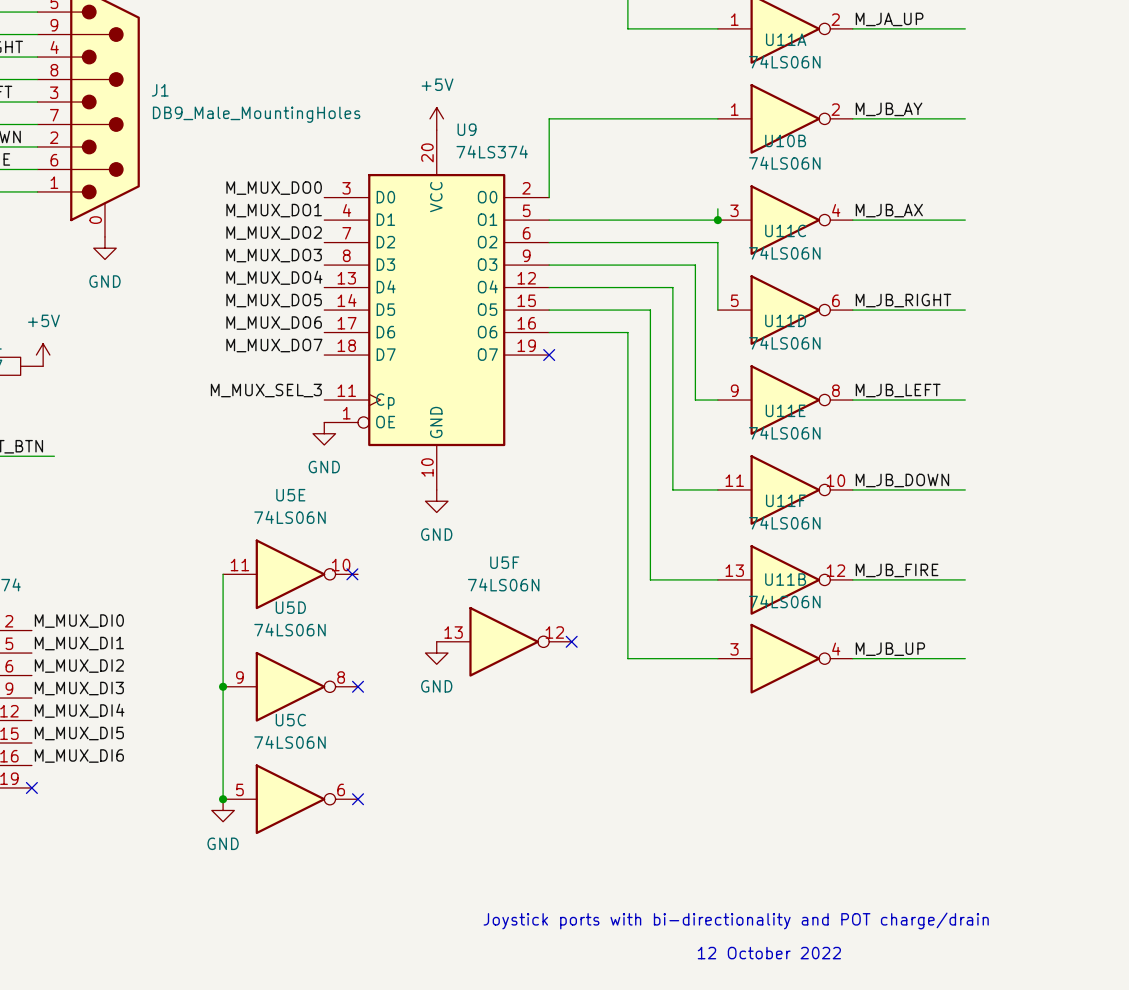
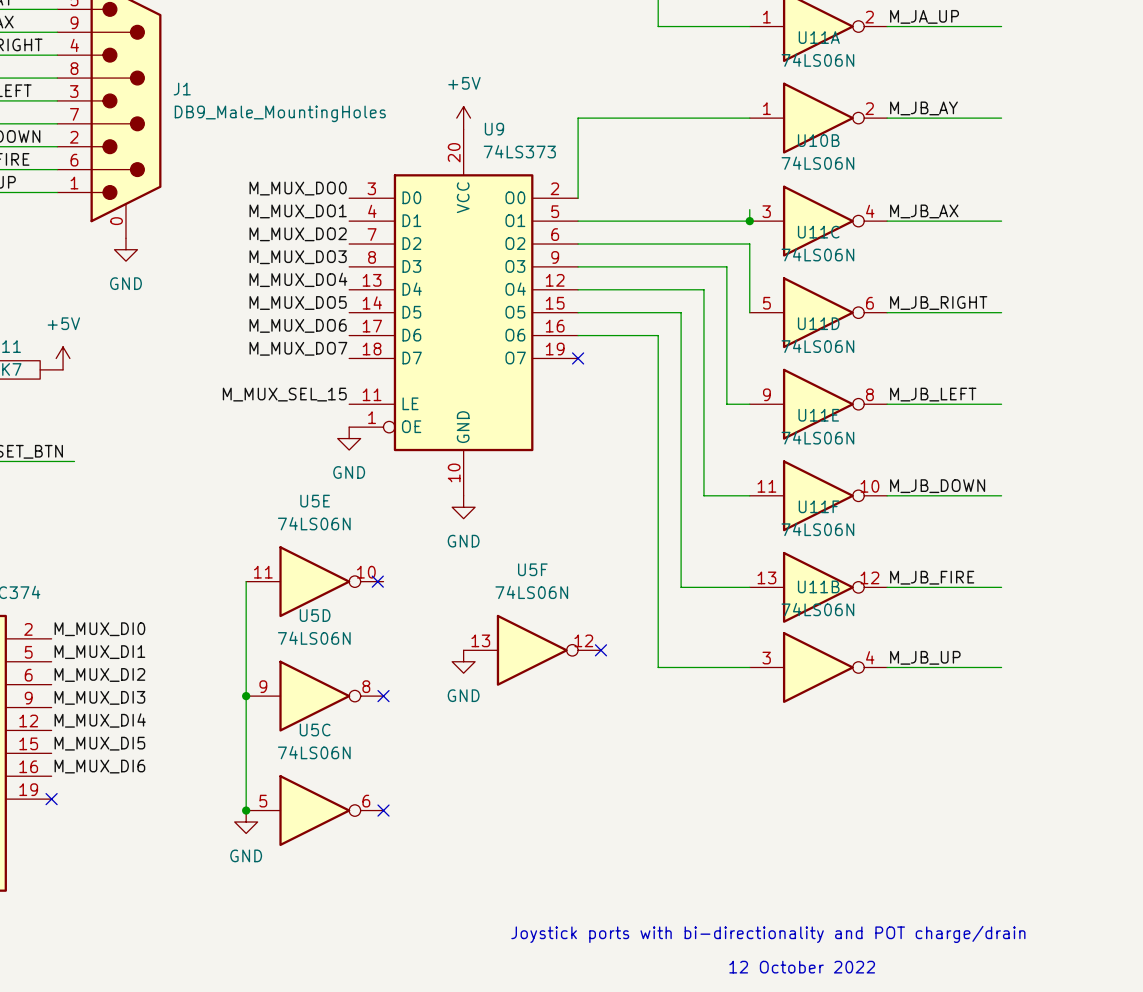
U9 symbol: [324, 130, 550, 490] -> [349, 129, 579, 496]
U9 value: 74LS374 (492, 151) -> 74LS373 (519, 151)
label: M_MUX_SEL_3 (266, 390) -> M_MUX_SEL_15 (284, 394)

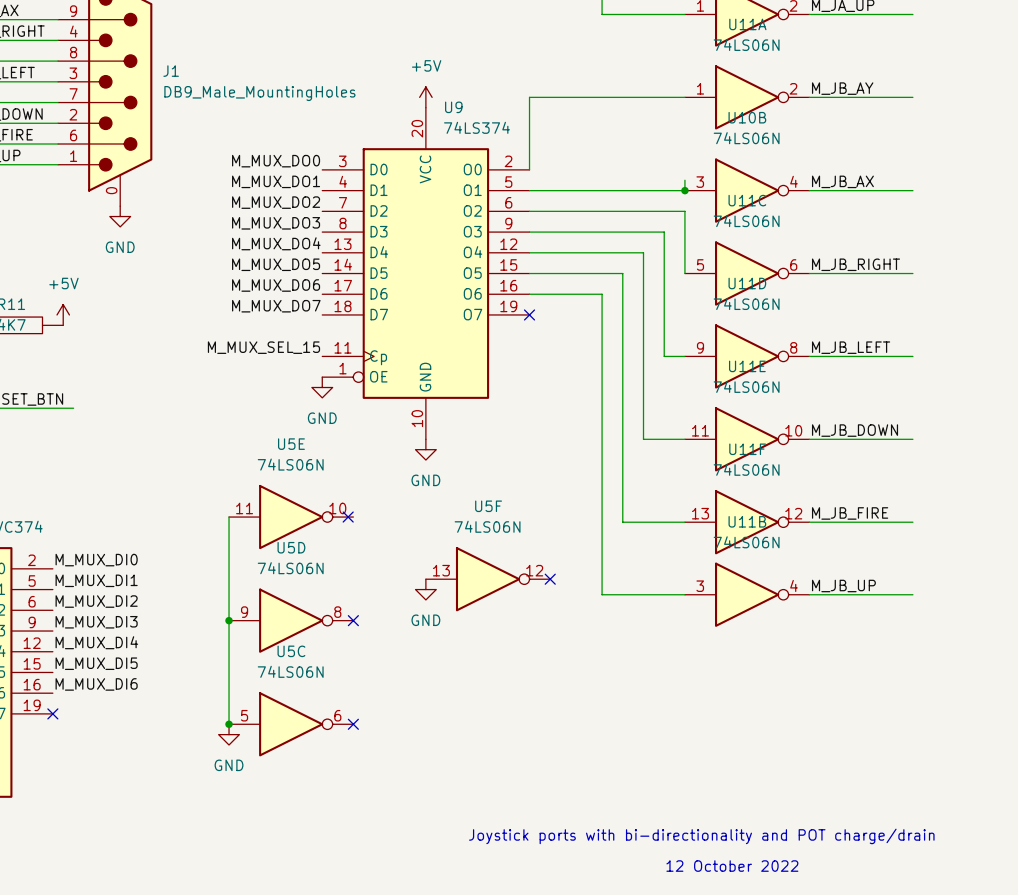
U9 symbol: [349, 129, 579, 496] -> [322, 107, 530, 440]
U9 value: 74LS373 (519, 151) -> 74LS374 (476, 127)

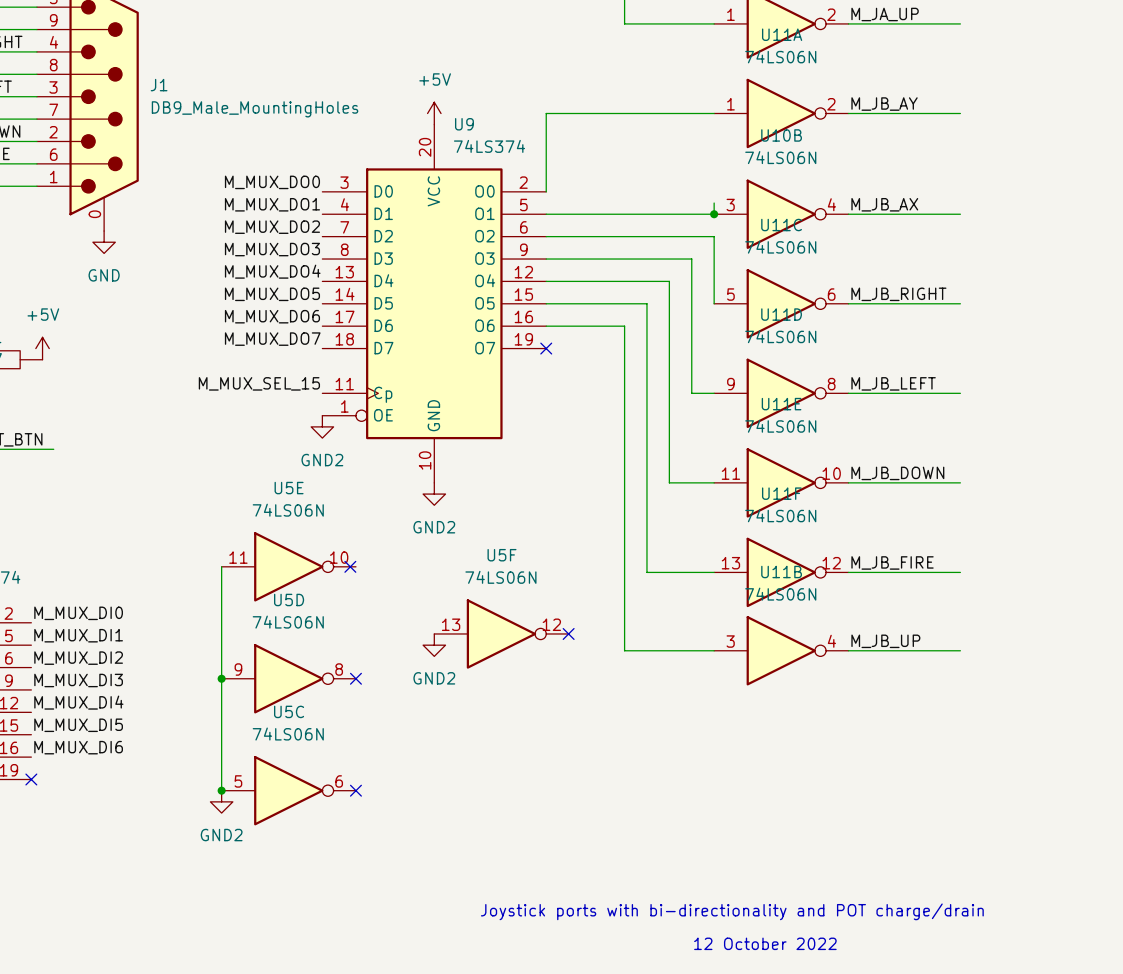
power symbol: GND (322, 387) -> GND2 (322, 426)
power symbol: GND (425, 449) -> GND2 (434, 494)
power symbol: GND (425, 589) -> GND2 (434, 645)
power symbol: GND (229, 734) -> GND2 (221, 801)

